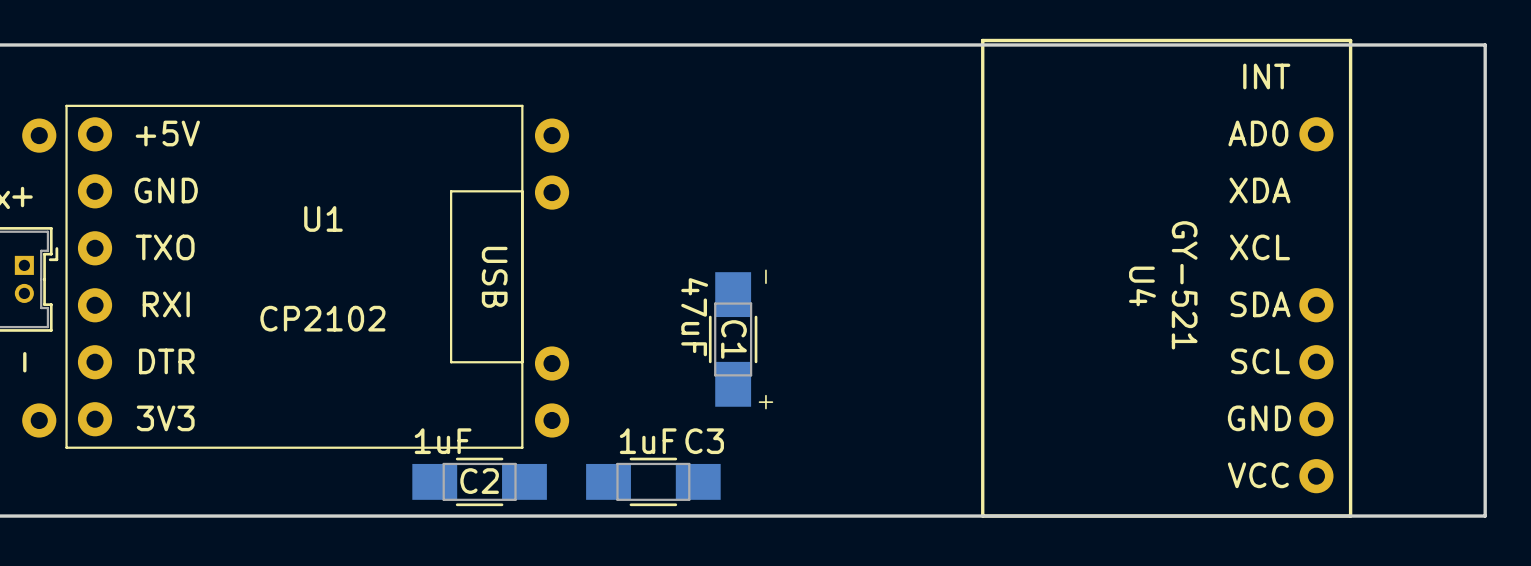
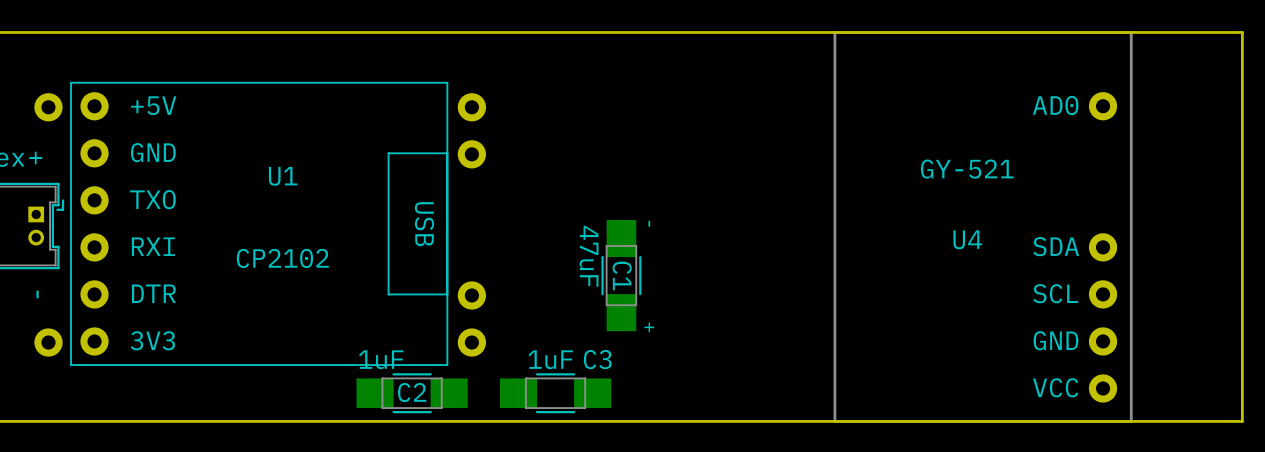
U4 footprint: [981, 38, 1353, 518] -> [833, 31, 1133, 423]
U4 value position: GY-521 (1184, 285) -> GY-521 (967, 169)

